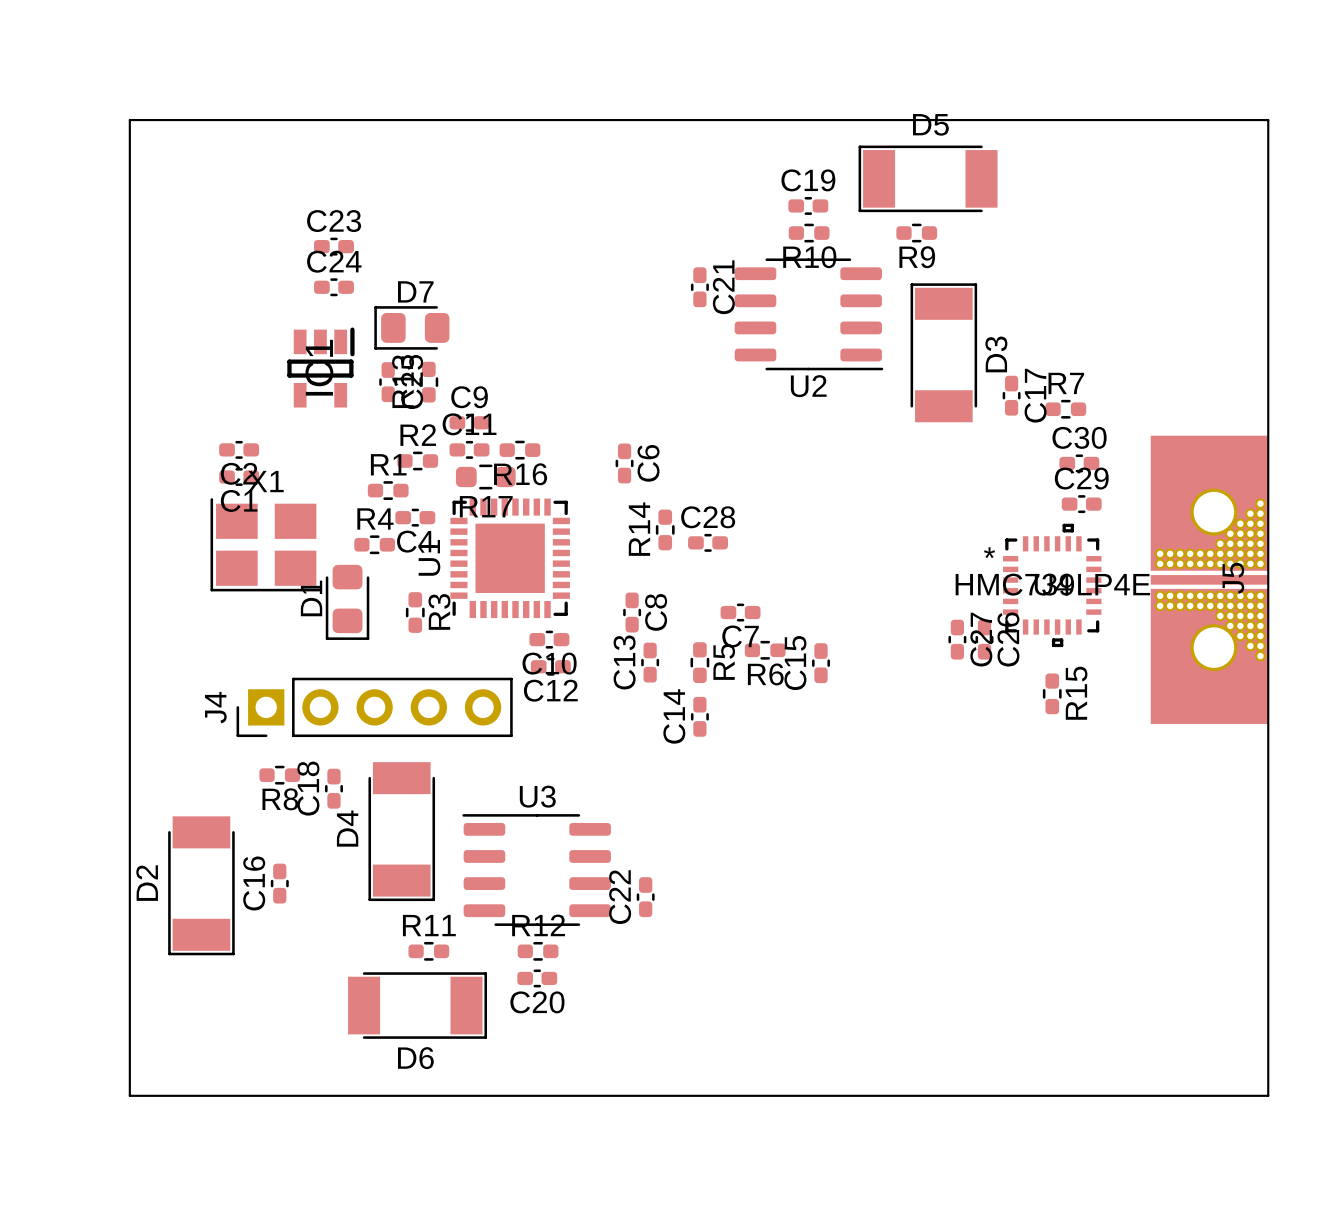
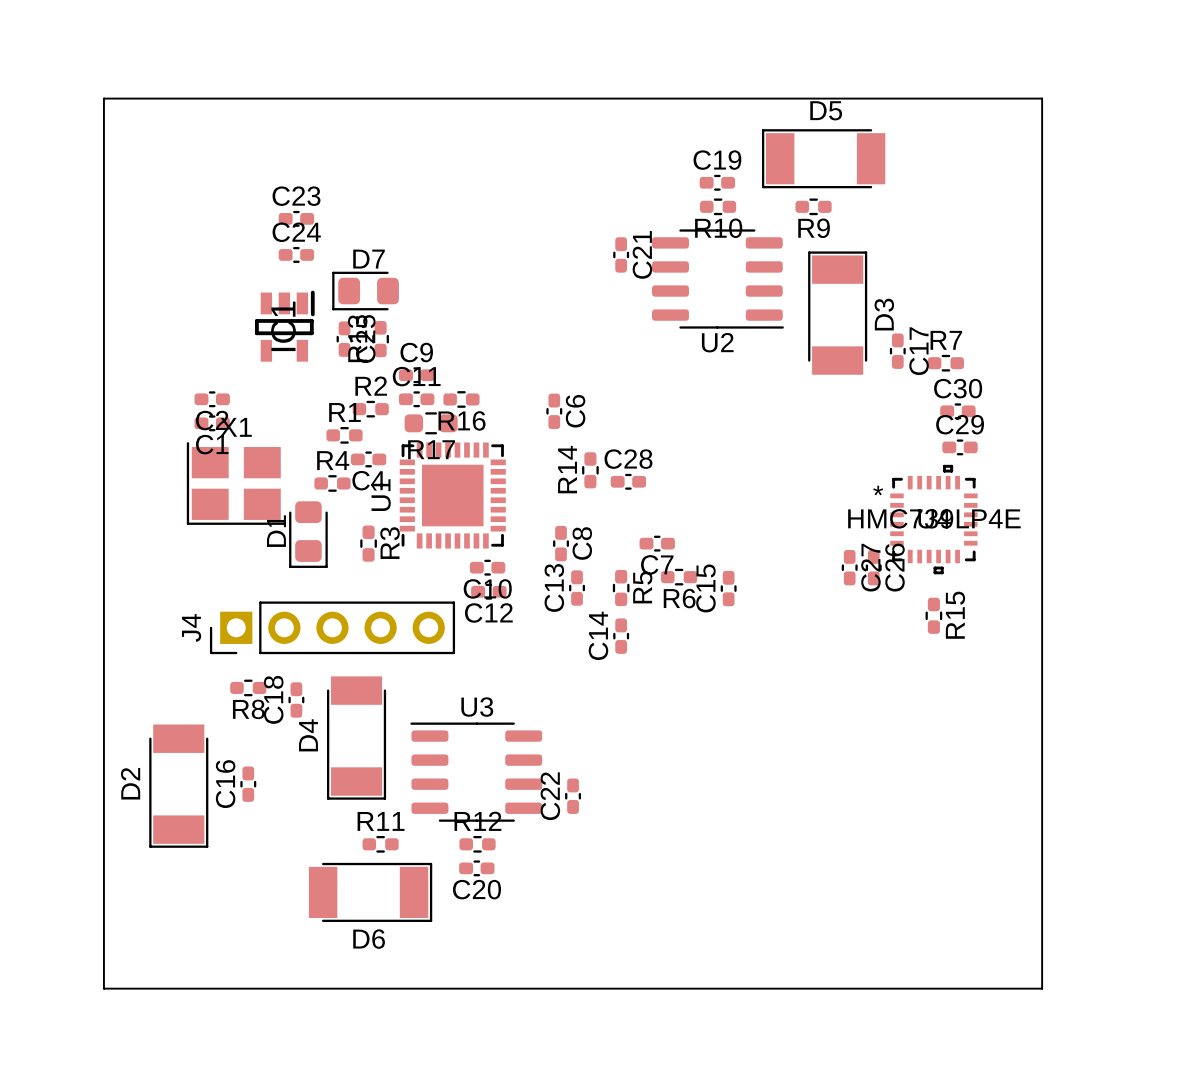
board edge: (129, 120) (1268, 120) (1268, 1095) (129, 1095) (129, 120) -> (103, 98) (103, 988) (1042, 988) (1042, 98) (103, 98)
J5: (1209, 579) -> none

